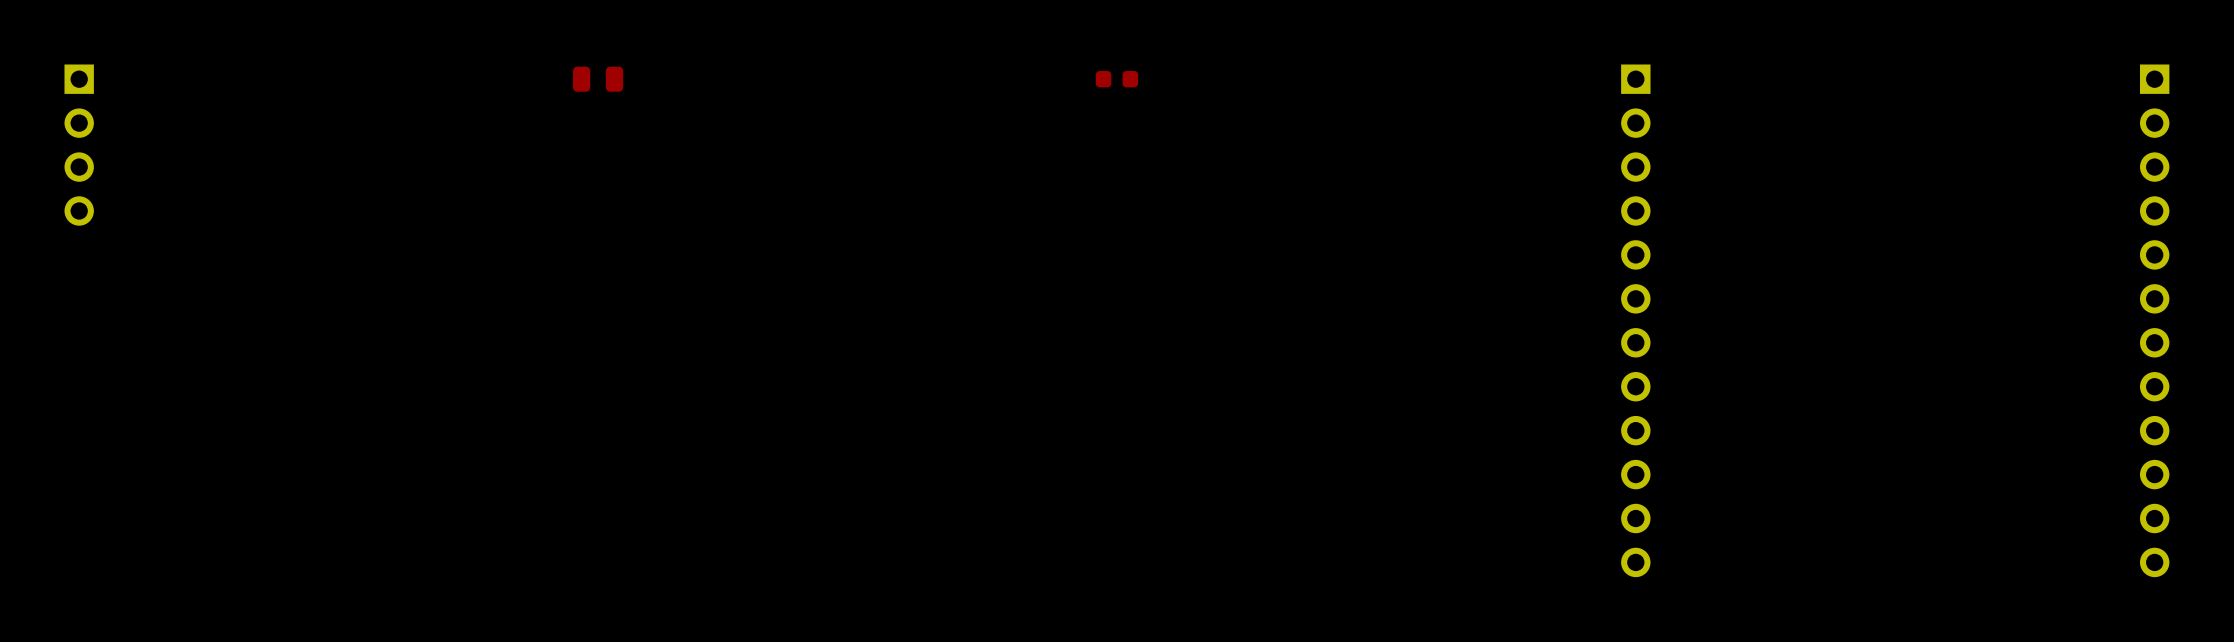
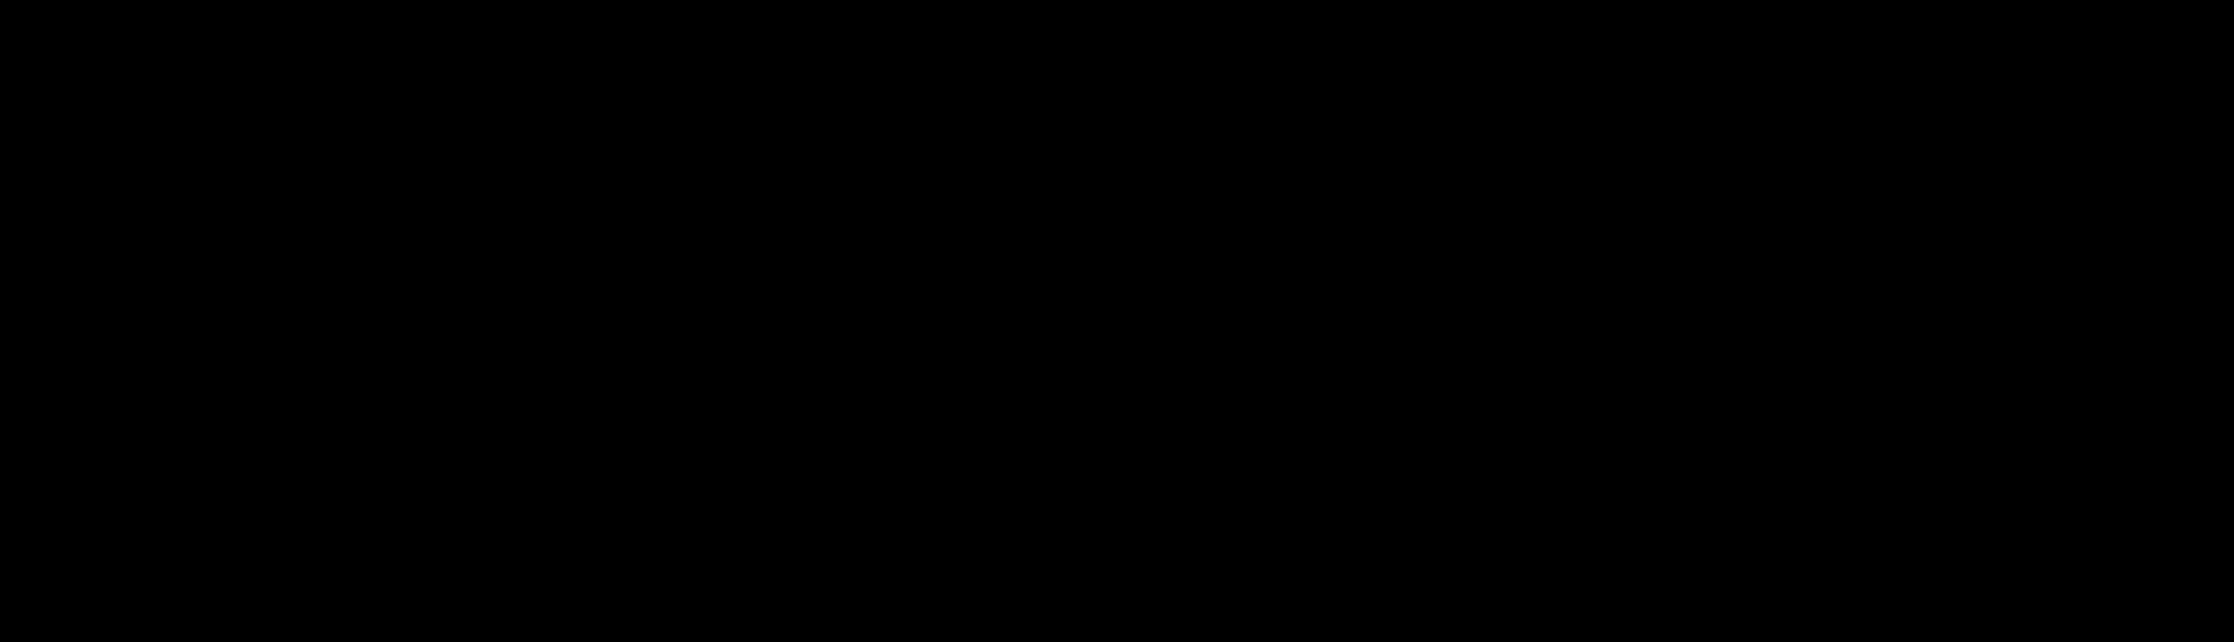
part: (598, 79) -> none
part: (1116, 79) -> none
part: (79, 145) -> none
part: (1635, 320) -> none
part: (2154, 320) -> none

